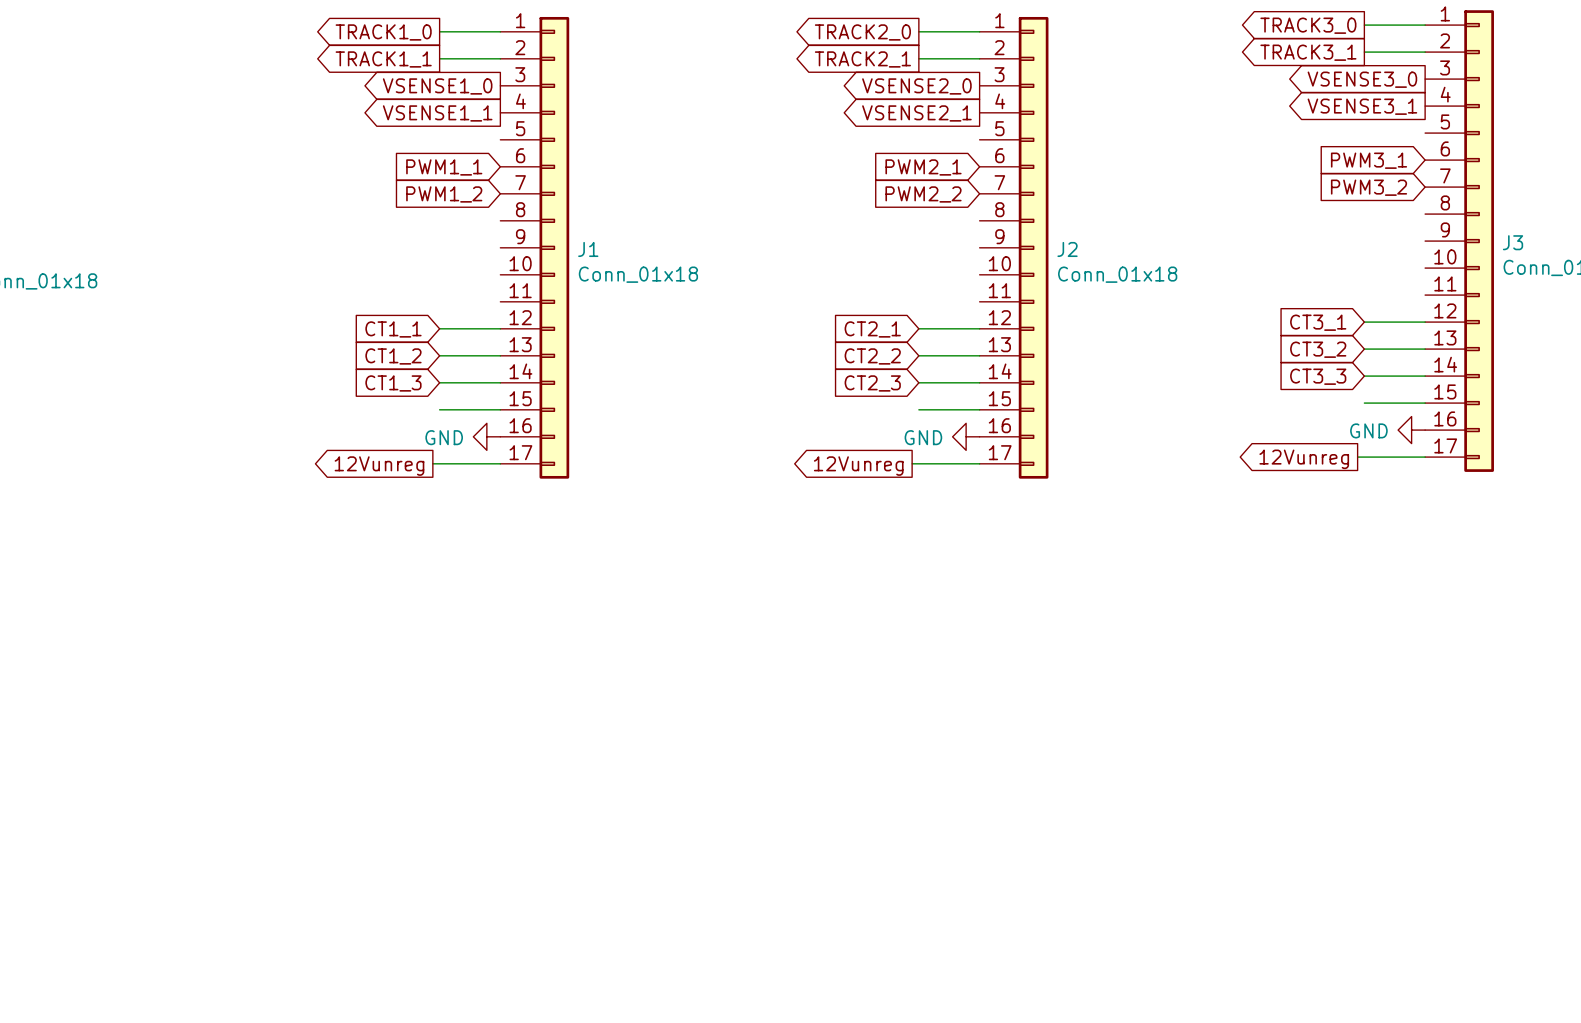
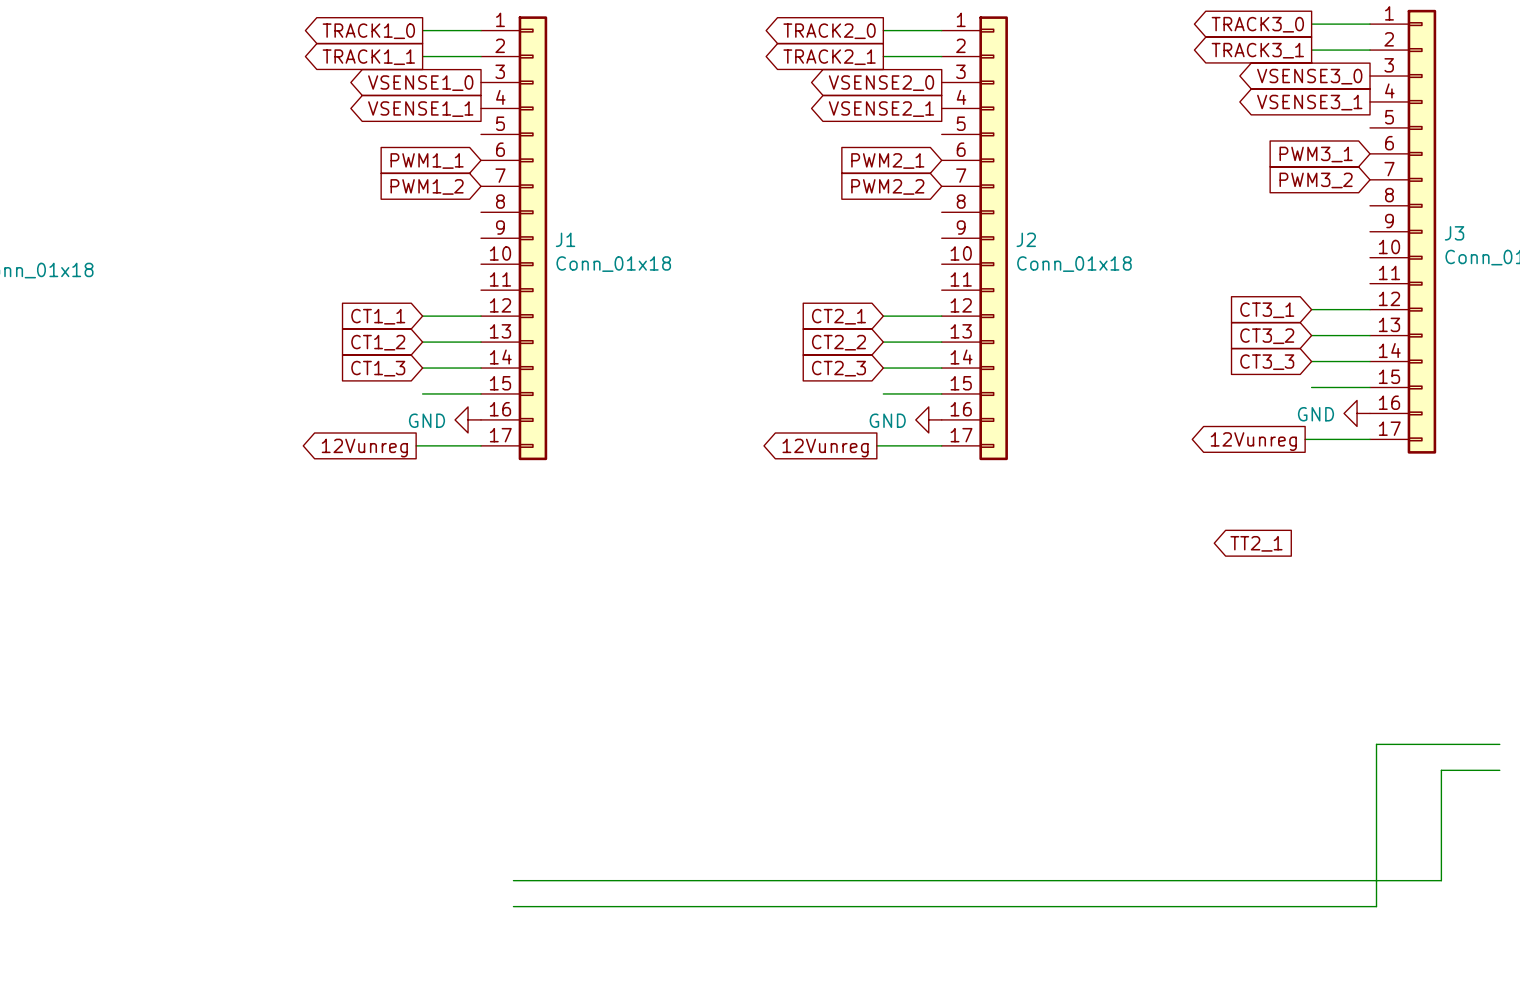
global label: none -> TT2_1 (1256, 543)
wire: none -> (1499, 744) (1376, 744) (1376, 906) (513, 906)
wire: none -> (1499, 770) (1441, 770) (1441, 880) (513, 880)

